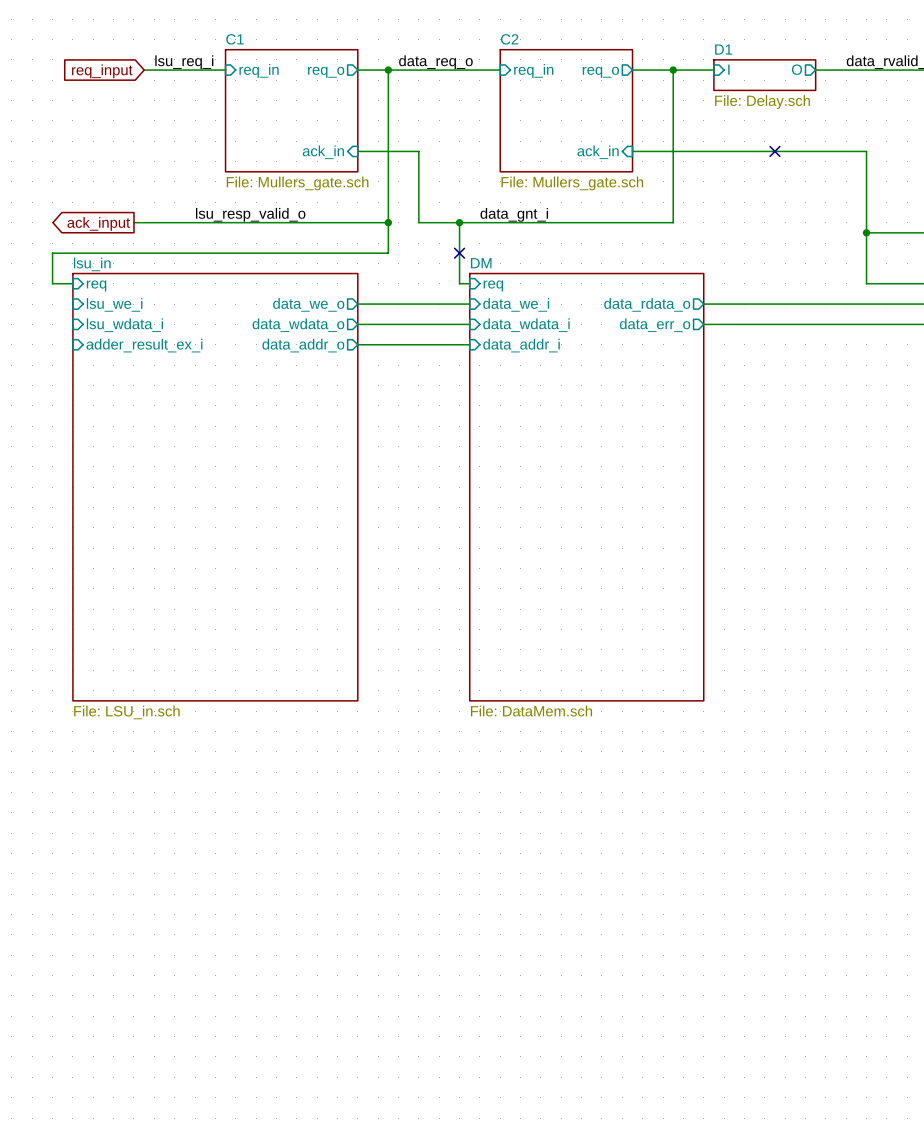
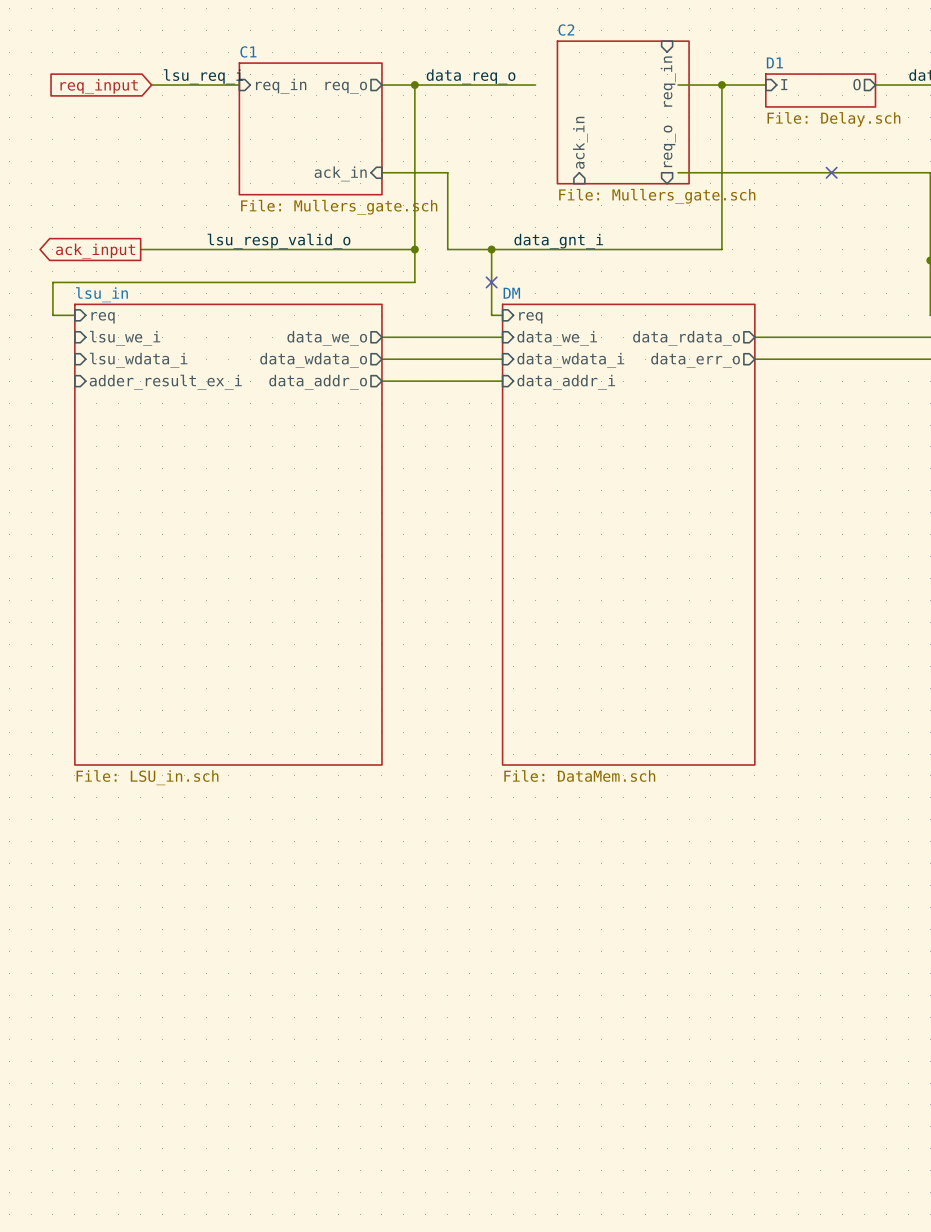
sheet pin rotation: 0° (533, 70) -> 90° clockwise (668, 81)
sheet pin position: req_in (533, 70) -> req_in (668, 81)
sheet pin rotation: 0° (600, 72) -> 90° clockwise (669, 146)
sheet pin position: req_o (600, 72) -> req_o (669, 146)
sheet C2 rotation: 0° (566, 110) -> 90° clockwise (623, 112)
sheet pin rotation: 0° (598, 152) -> 90° clockwise (580, 142)

